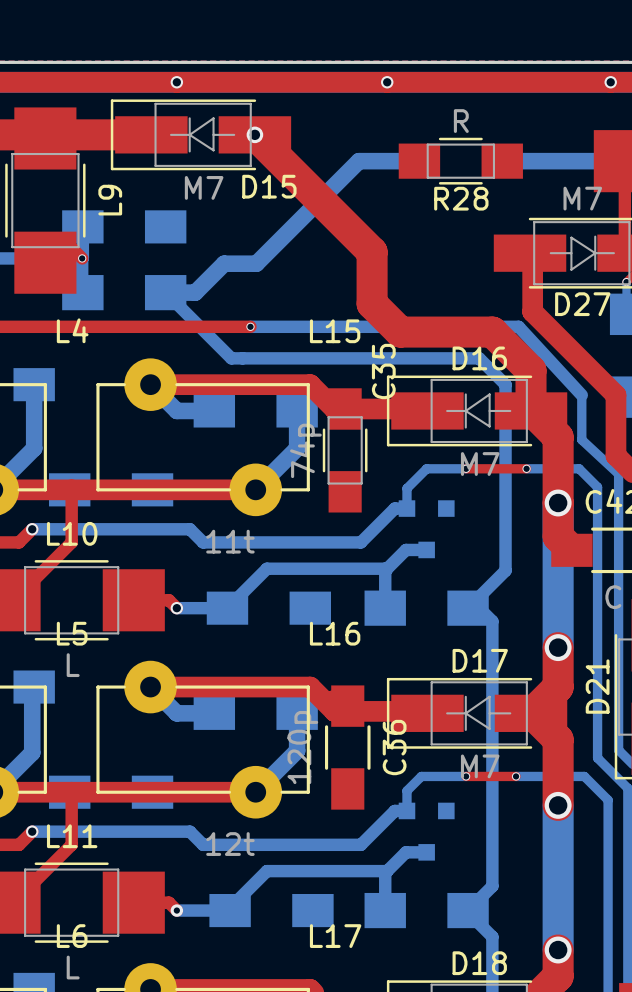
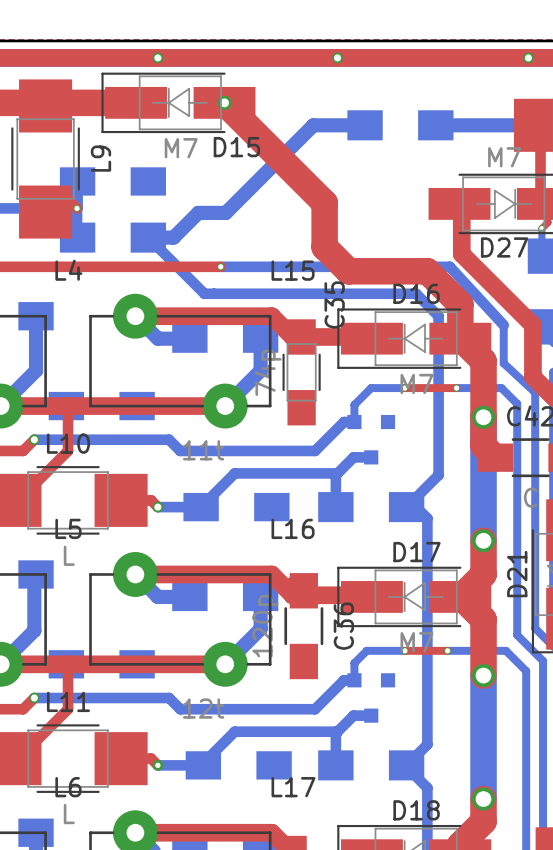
R28 side: top (460, 161) -> bottom (400, 125)

